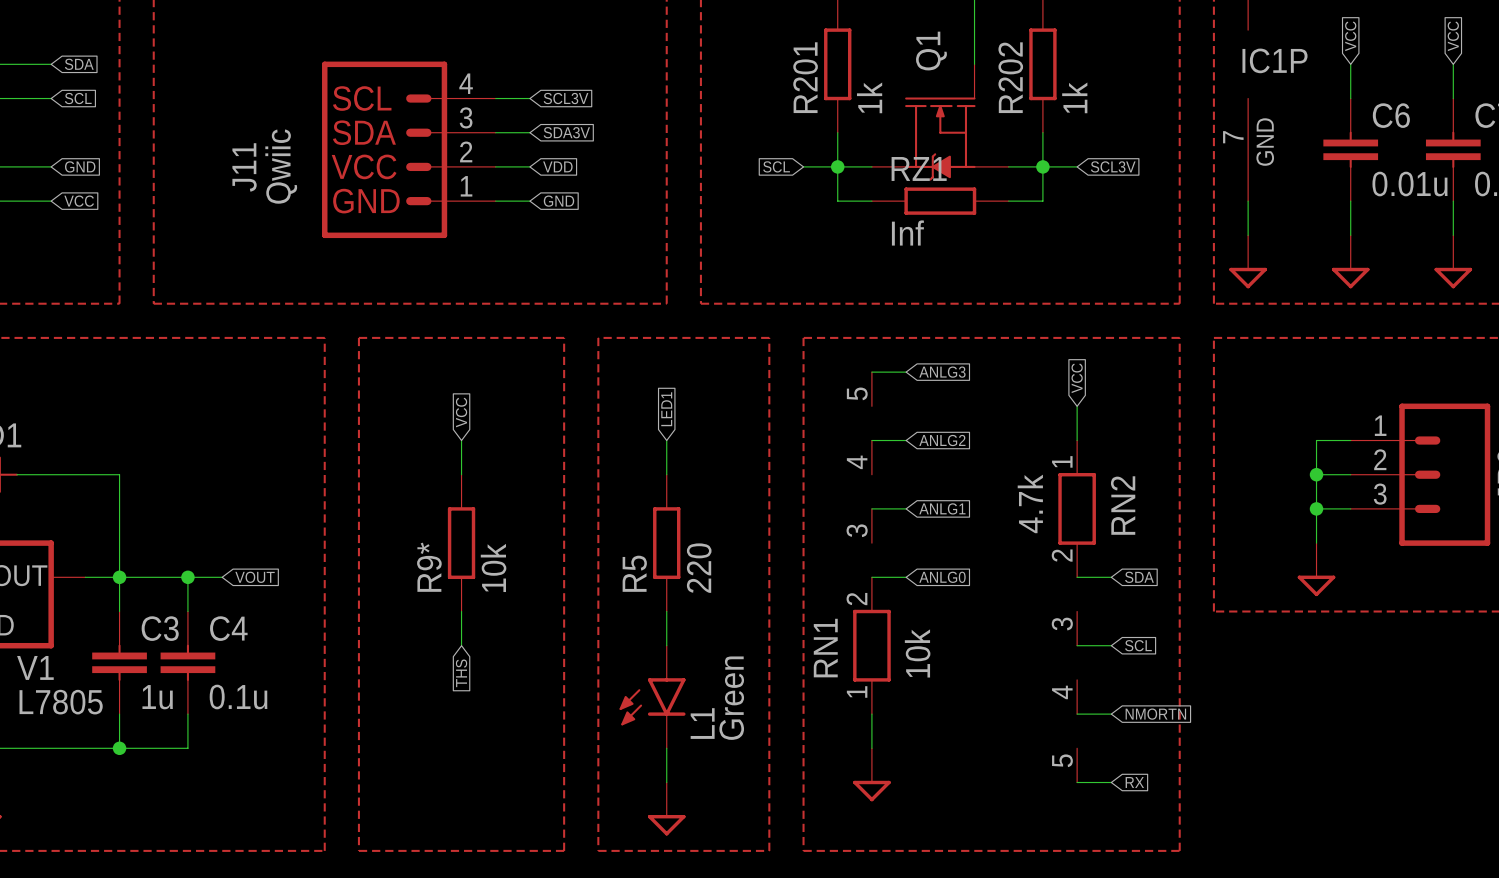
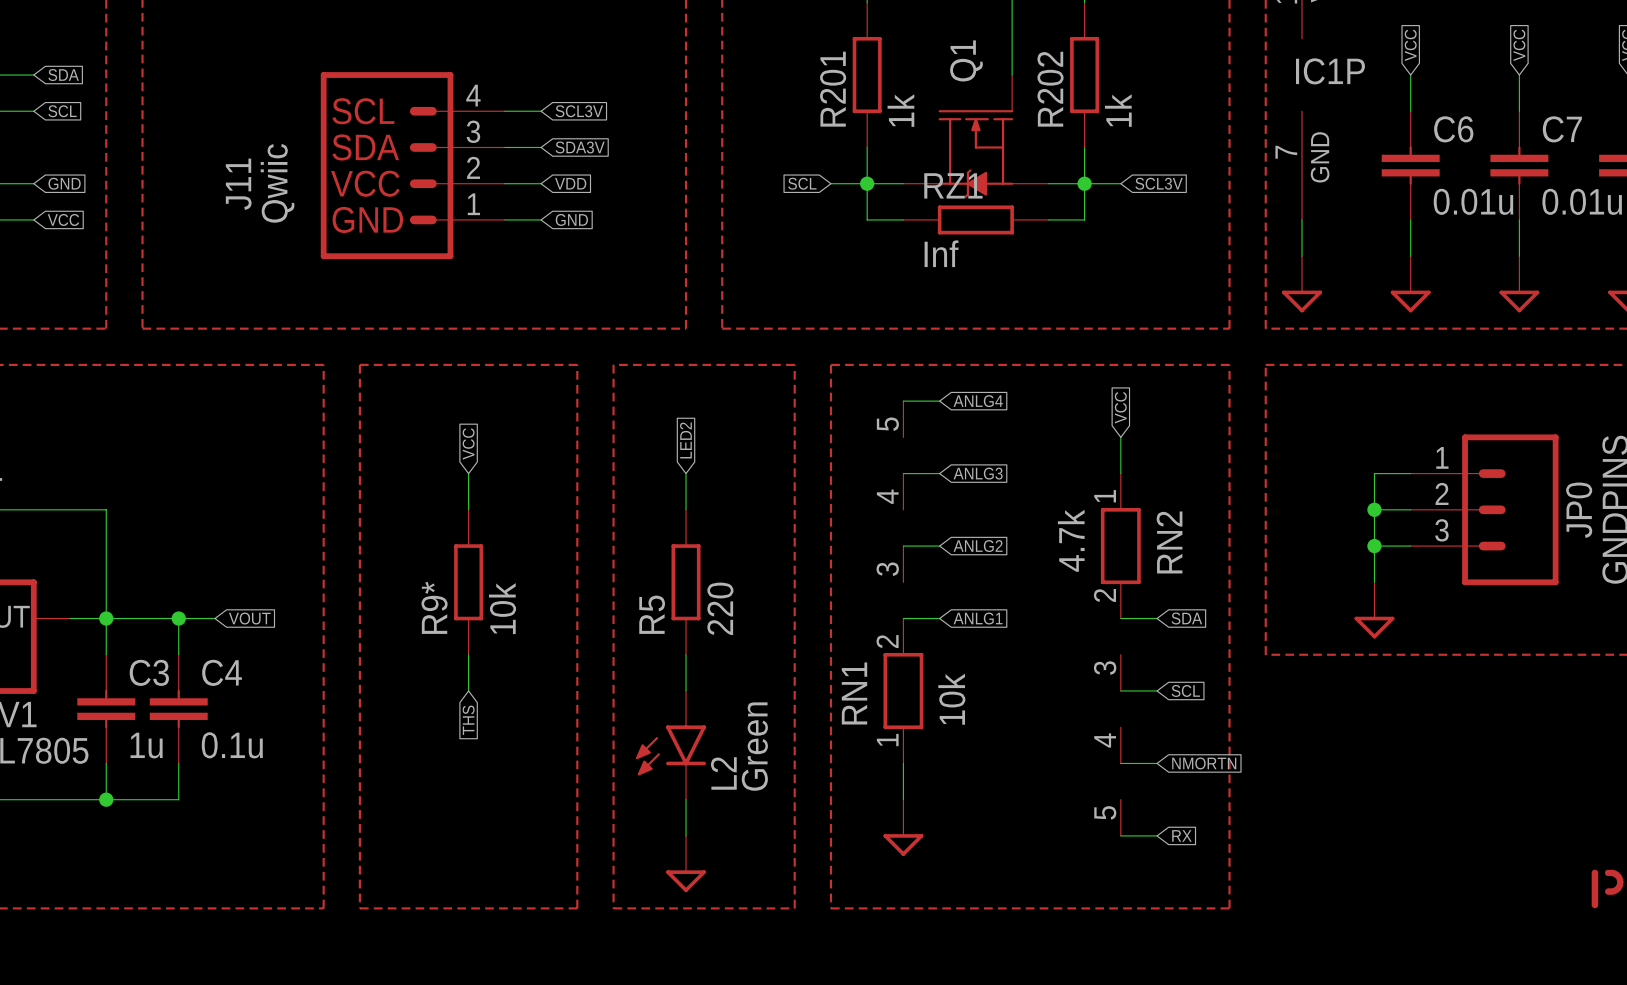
global label: ANLG3 (942, 372) -> ANLG4 (978, 401)
global label: LED1 (666, 409) -> LED2 (685, 440)
global label: ANLG2 (942, 440) -> ANLG3 (978, 473)
global label: ANLG1 (942, 508) -> ANLG2 (978, 546)
global label: ANLG0 (942, 577) -> ANLG1 (978, 618)
L1 name: L1 (702, 723) -> L2 (723, 773)

